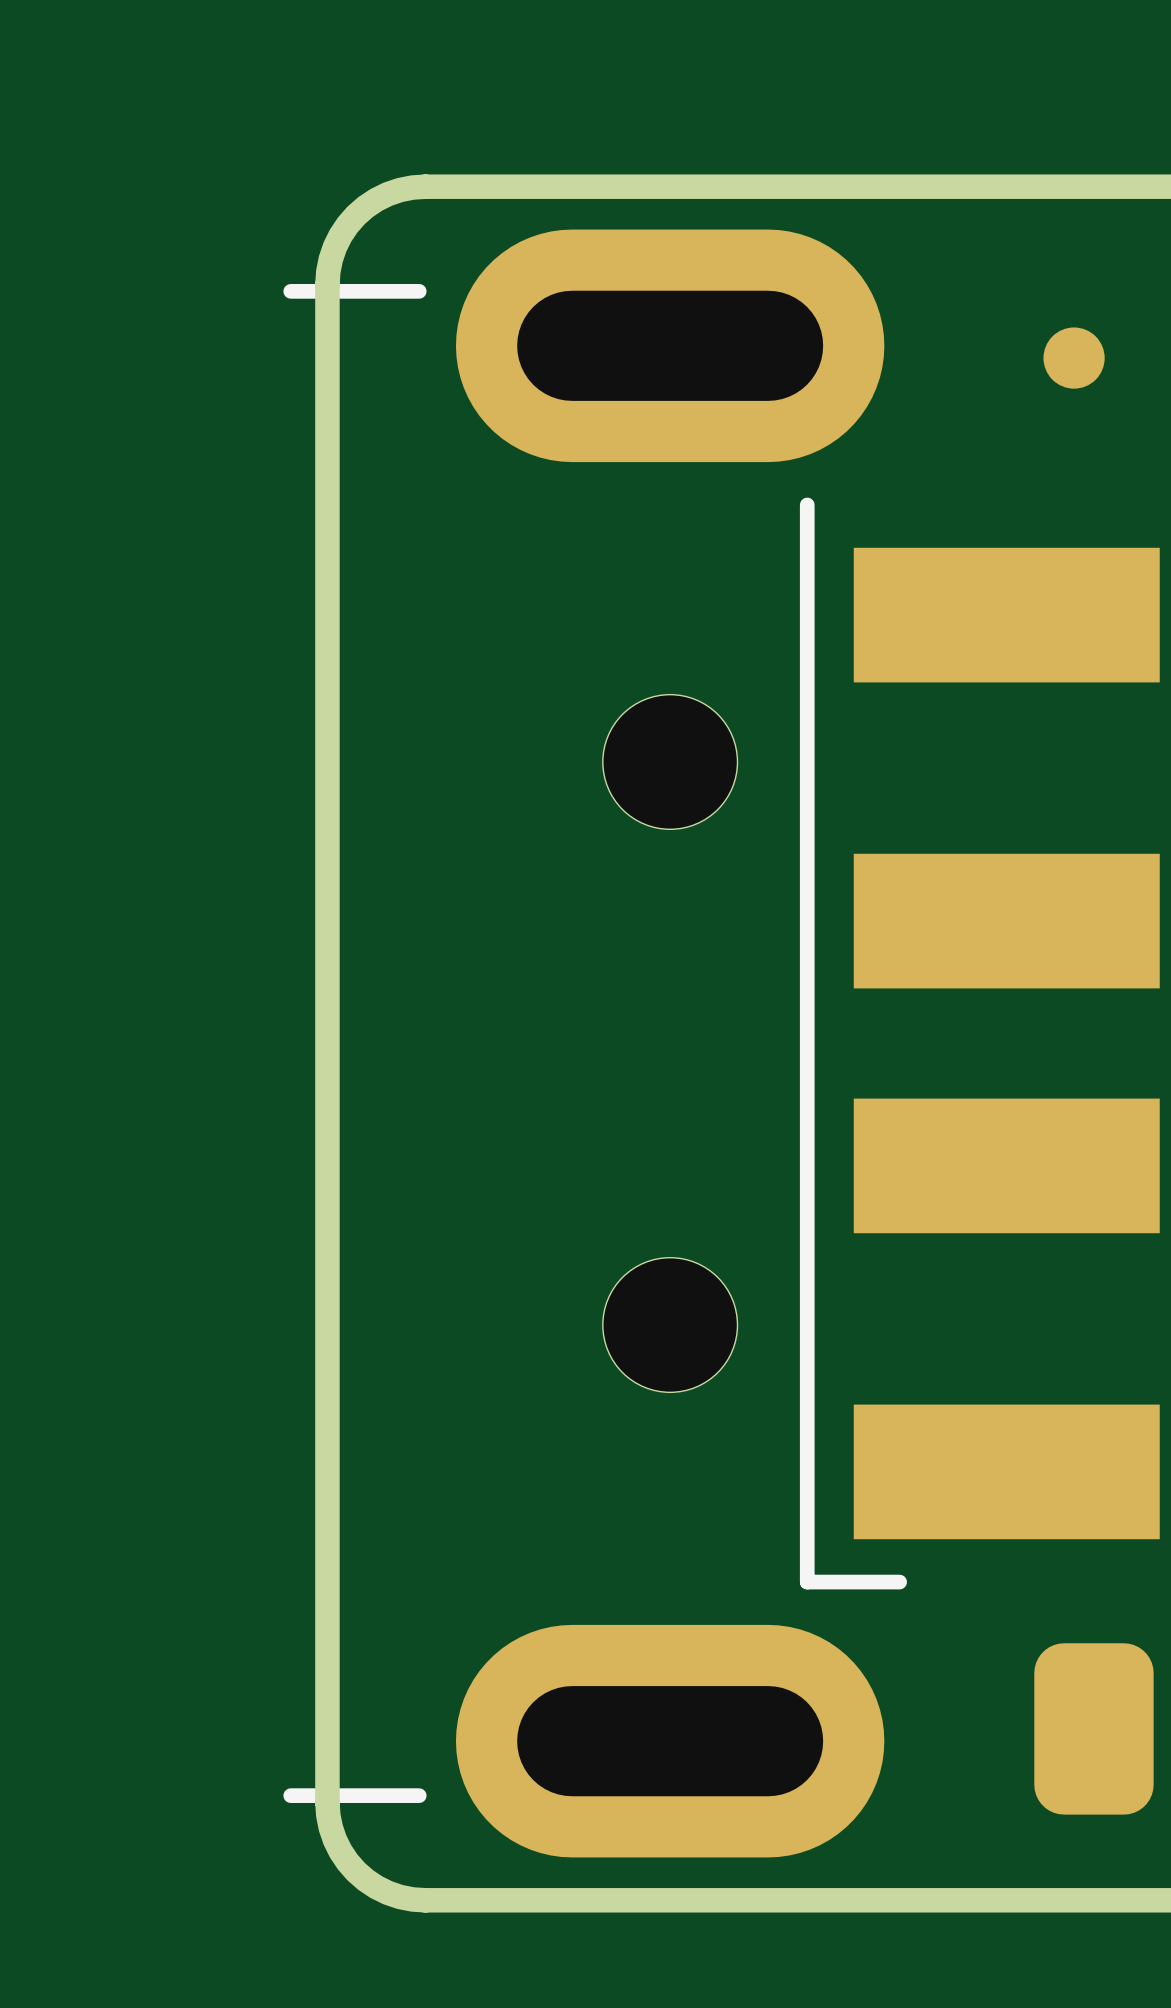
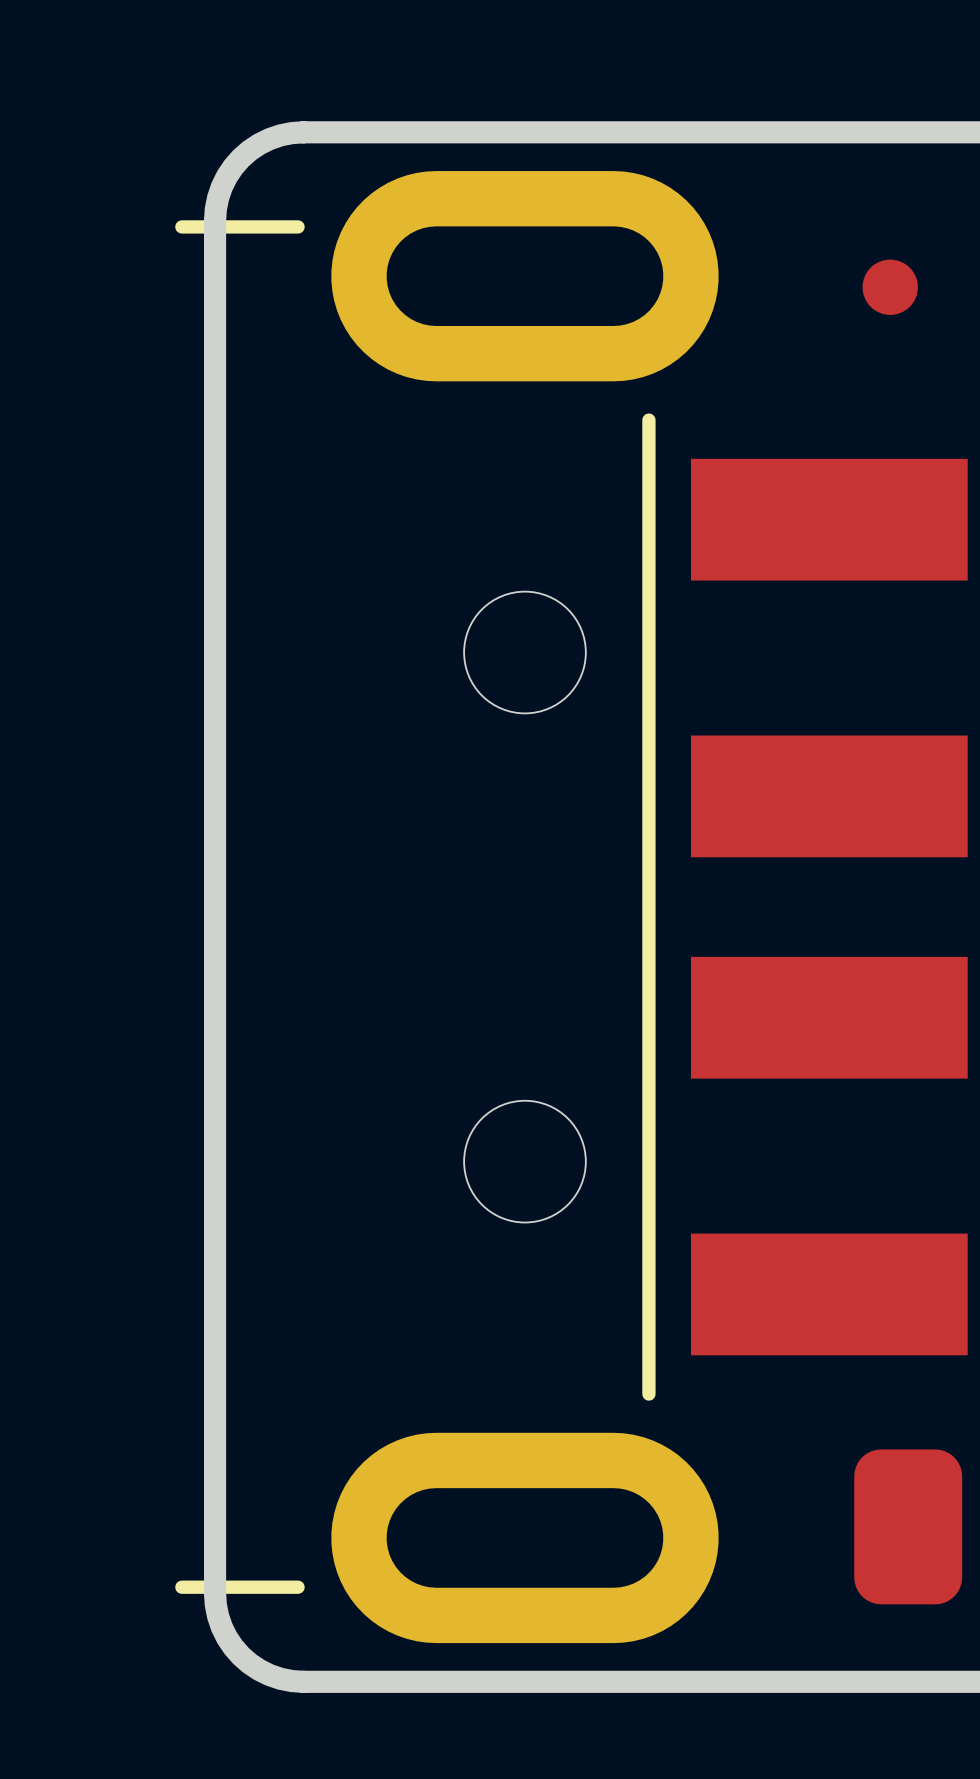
part footprint: [283, 229, 1160, 1858] -> [175, 171, 968, 1644]

